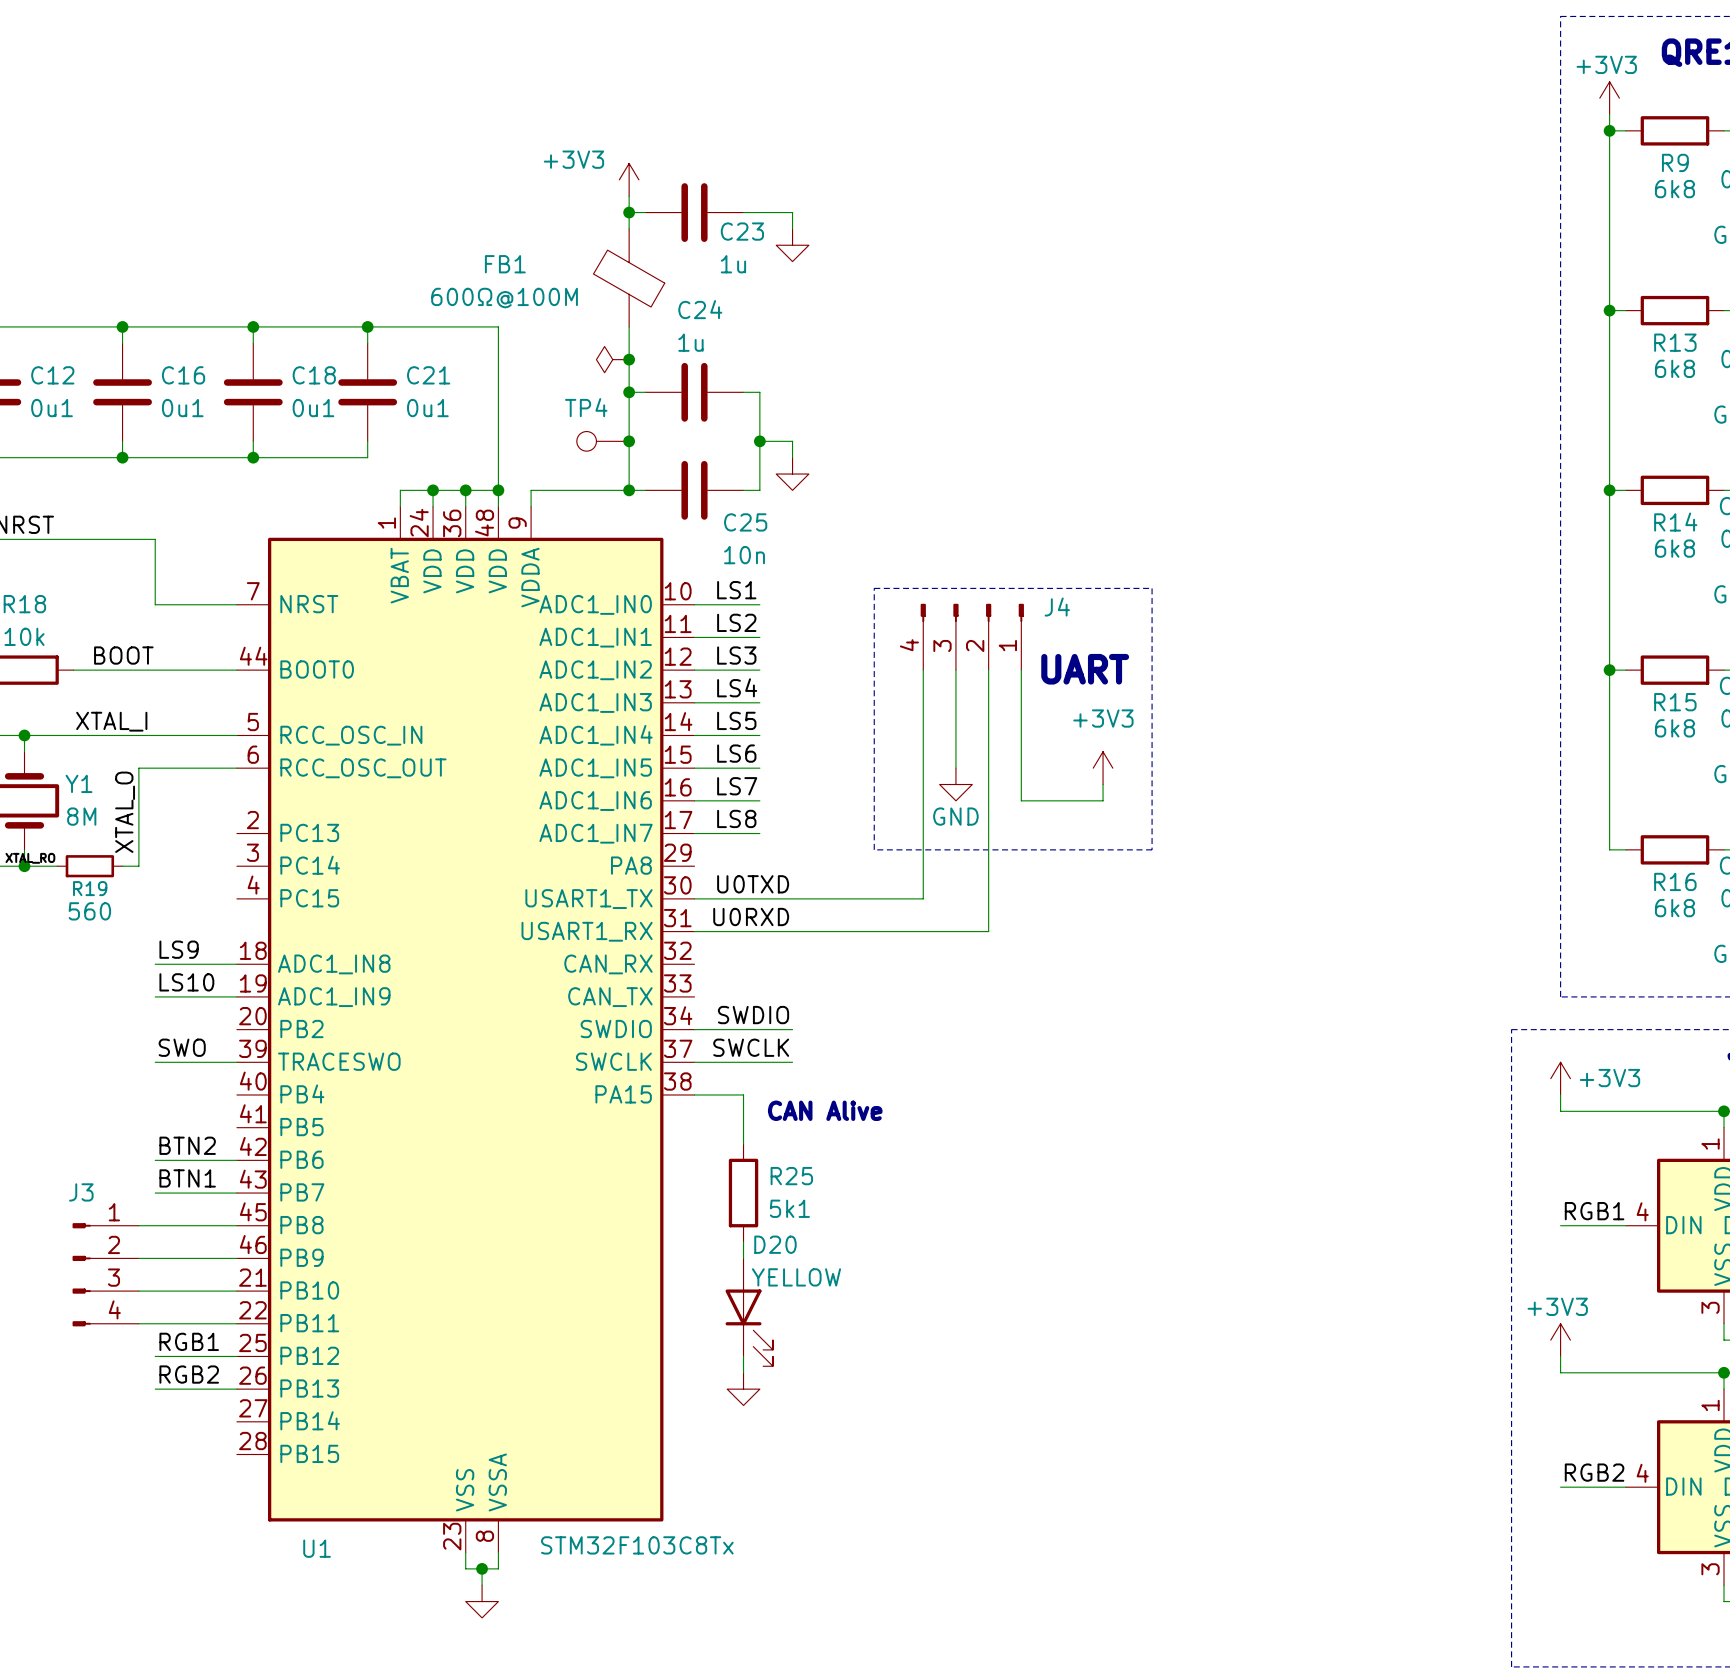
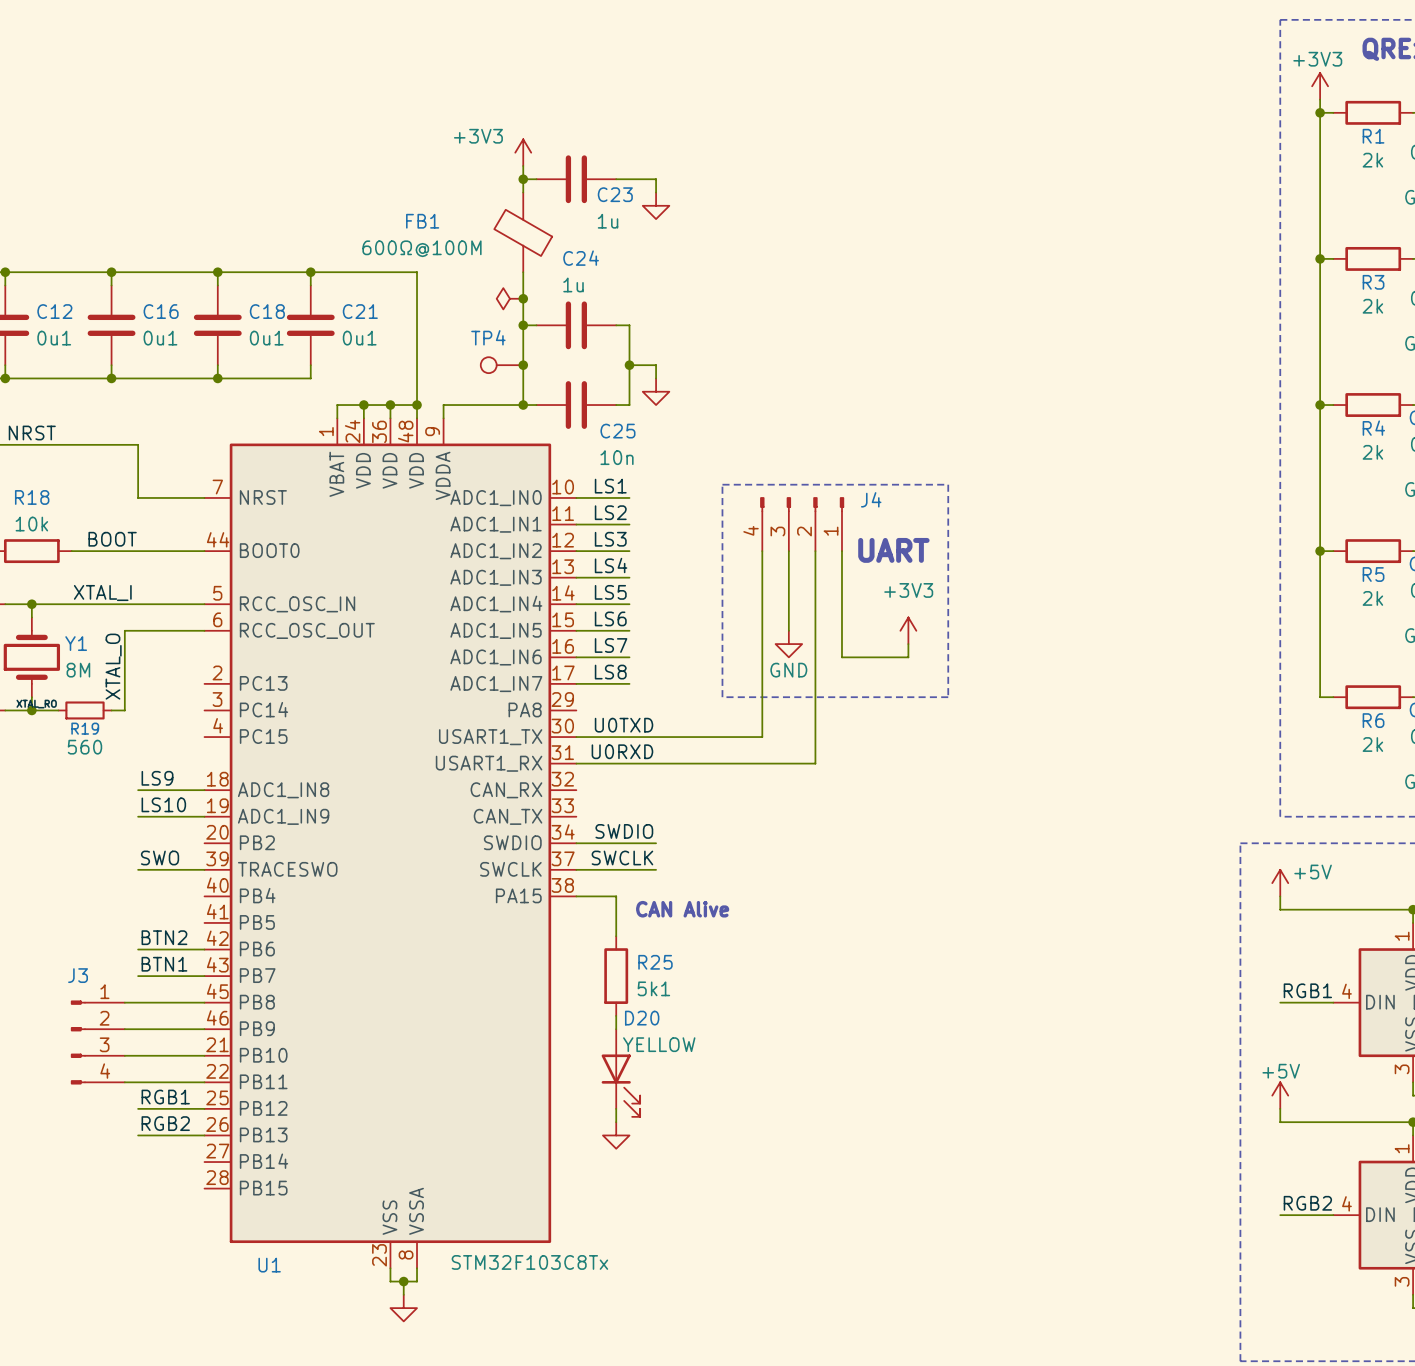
R9 name: R9 (1675, 162) -> R1 (1373, 136)
R9 value: 6k8 (1674, 189) -> 2k (1372, 160)
R13 name: R13 (1675, 342) -> R3 (1373, 282)
R13 value: 6k8 (1674, 368) -> 2k (1372, 306)
R14 name: R14 (1675, 522) -> R4 (1373, 428)
R14 value: 6k8 (1674, 548) -> 2k (1372, 452)
R15 name: R15 (1675, 702) -> R5 (1373, 574)
R15 value: 6k8 (1674, 728) -> 2k (1372, 598)
R16 name: R16 (1675, 881) -> R6 (1373, 720)
R16 value: 6k8 (1674, 908) -> 2k (1372, 744)
power symbol: +3V3 (1560, 1078) -> +5V (1280, 883)
power symbol: +3V3 (1560, 1340) -> +5V (1280, 1095)

